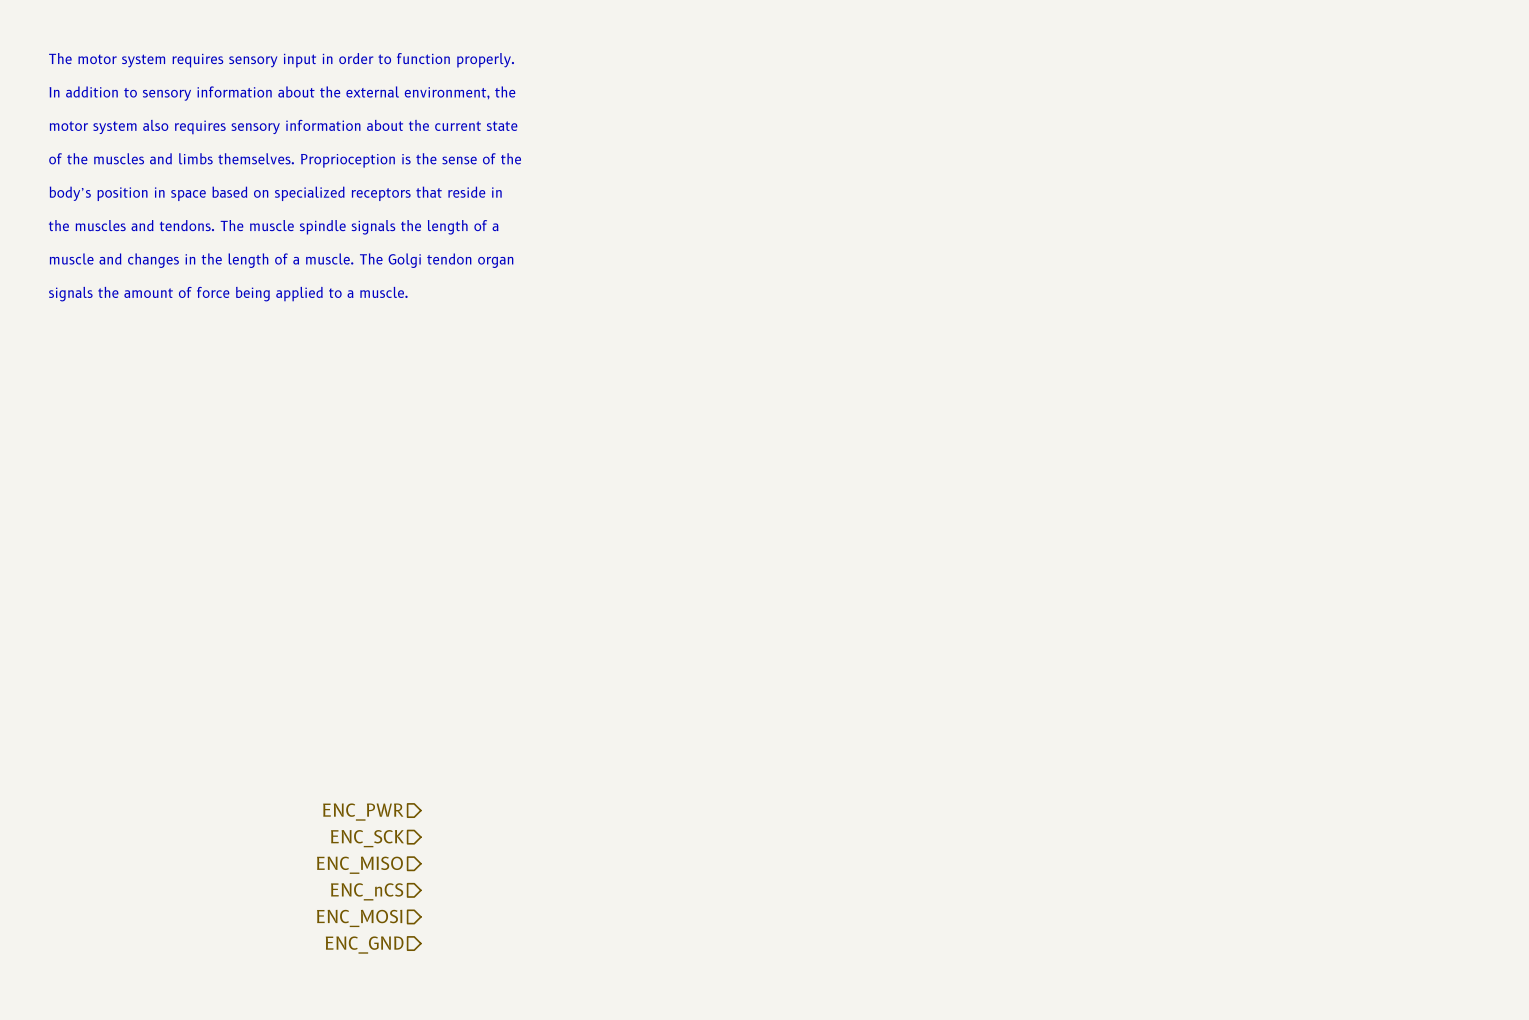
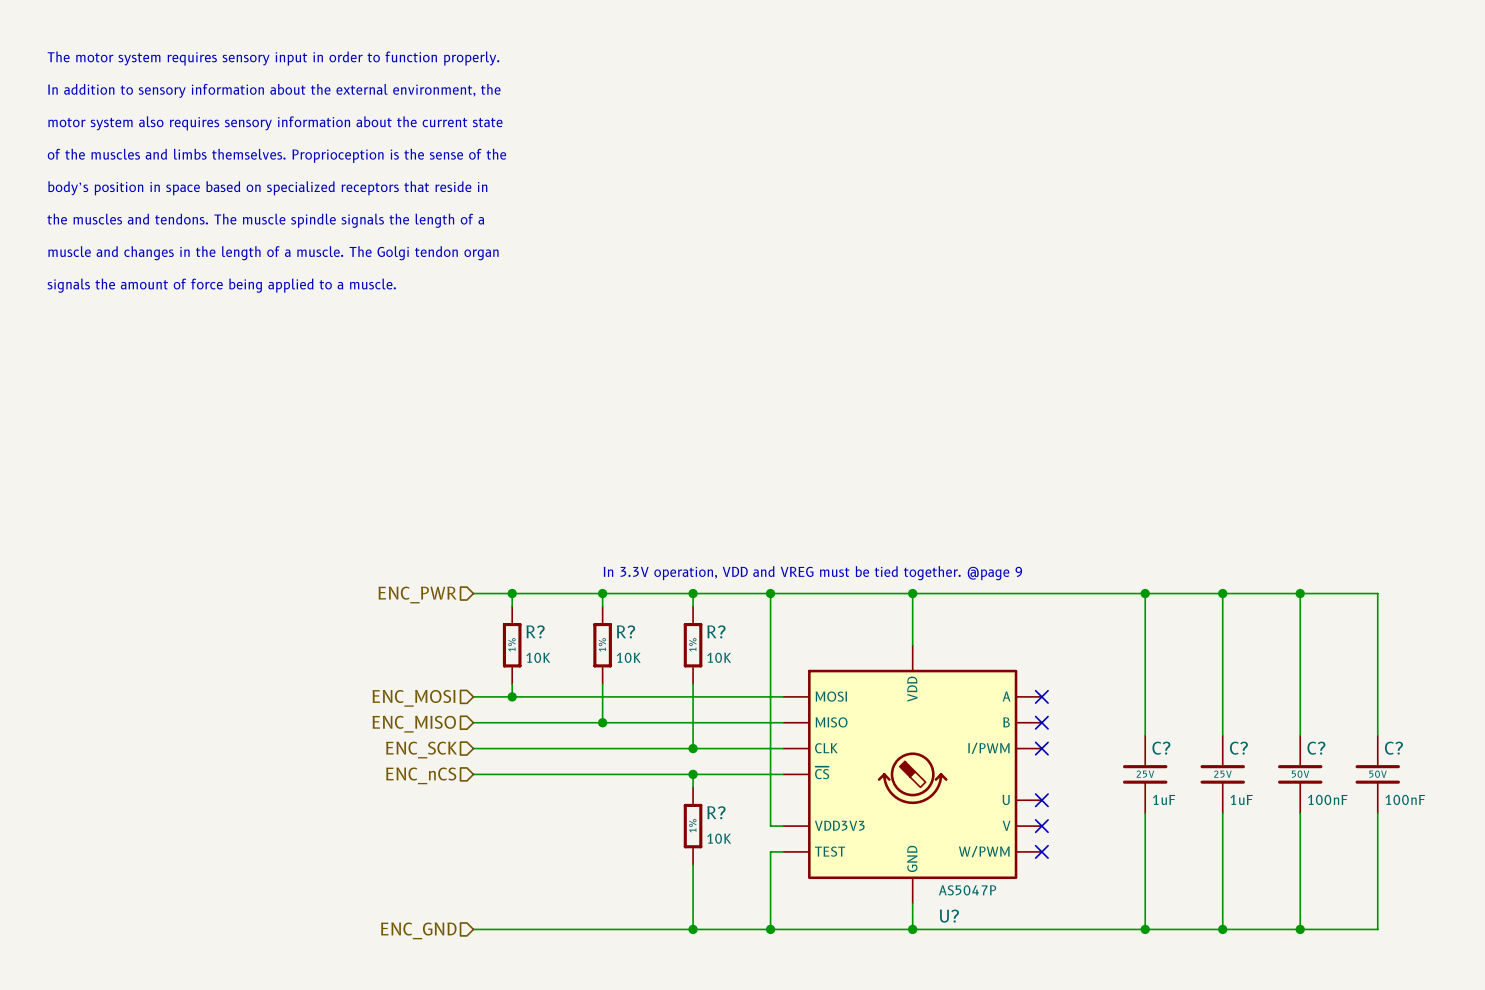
text: none -> In 3.3V operation, VDD and VREG must be tied together. @page 9 (812, 573)
wire: none -> (473, 593) (1377, 593) (1377, 735)
wire: none -> (512, 593) (512, 606)
junction: none -> (512, 593)
wire: none -> (602, 593) (602, 606)
junction: none -> (602, 593)
wire: none -> (693, 593) (693, 606)
junction: none -> (693, 593)
wire: none -> (770, 593) (770, 826) (783, 826)
junction: none -> (770, 593)
wire: none -> (912, 593) (912, 645)
junction: none -> (912, 593)
wire: none -> (1145, 593) (1145, 735)
junction: none -> (1145, 593)
wire: none -> (1222, 593) (1222, 735)
junction: none -> (1222, 593)
wire: none -> (1300, 593) (1300, 735)
junction: none -> (1300, 593)
R?: none -> 10K (512, 645)
R?: none -> 10K (602, 645)
R?: none -> 10K (693, 645)
wire: none -> (512, 683) (512, 696)
wire: none -> (602, 683) (602, 722)
wire: none -> (693, 683) (693, 748)
wire: none -> (473, 696) (783, 696)
junction: none -> (512, 696)
no-connect mark: none -> (1041, 696)
wire: none -> (473, 722) (783, 722)
junction: none -> (602, 722)
no-connect mark: none -> (1041, 722)
wire: none -> (473, 748) (783, 748)
junction: none -> (693, 748)
no-connect mark: none -> (1041, 748)
wire: none -> (473, 774) (783, 774)
wire: none -> (693, 774) (693, 787)
junction: none -> (693, 774)
U?: none -> AS5047P (912, 774)
C?: none -> 1uF (1145, 774)
C?: none -> 1uF (1222, 774)
C?: none -> 100nF (1300, 774)
C?: none -> 100nF (1377, 774)
hierarchical label position: ENC_PWR (363, 812) -> ENC_PWR (417, 595)
no-connect mark: none -> (1041, 800)
wire: none -> (1145, 813) (1145, 929)
wire: none -> (1222, 813) (1222, 929)
wire: none -> (1300, 813) (1300, 929)
wire: none -> (1377, 813) (1377, 929) (473, 929)
hierarchical label position: ENC_SCK (367, 838) -> ENC_SCK (421, 750)
R?: none -> 10K (693, 826)
no-connect mark: none -> (1041, 826)
hierarchical label position: ENC_MISO (359, 865) -> ENC_MISO (414, 724)
wire: none -> (783, 851) (770, 851) (770, 929)
no-connect mark: none -> (1041, 851)
wire: none -> (693, 864) (693, 929)
hierarchical label position: ENC_nCS (367, 891) -> ENC_nCS (421, 775)
hierarchical label position: ENC_MOSI (359, 918) -> ENC_MOSI (413, 698)
wire: none -> (912, 903) (912, 929)
hierarchical label position: ENC_GND (364, 945) -> ENC_GND (418, 930)
junction: none -> (693, 929)
junction: none -> (770, 929)
junction: none -> (912, 929)
junction: none -> (1145, 929)
junction: none -> (1222, 929)
junction: none -> (1300, 929)

